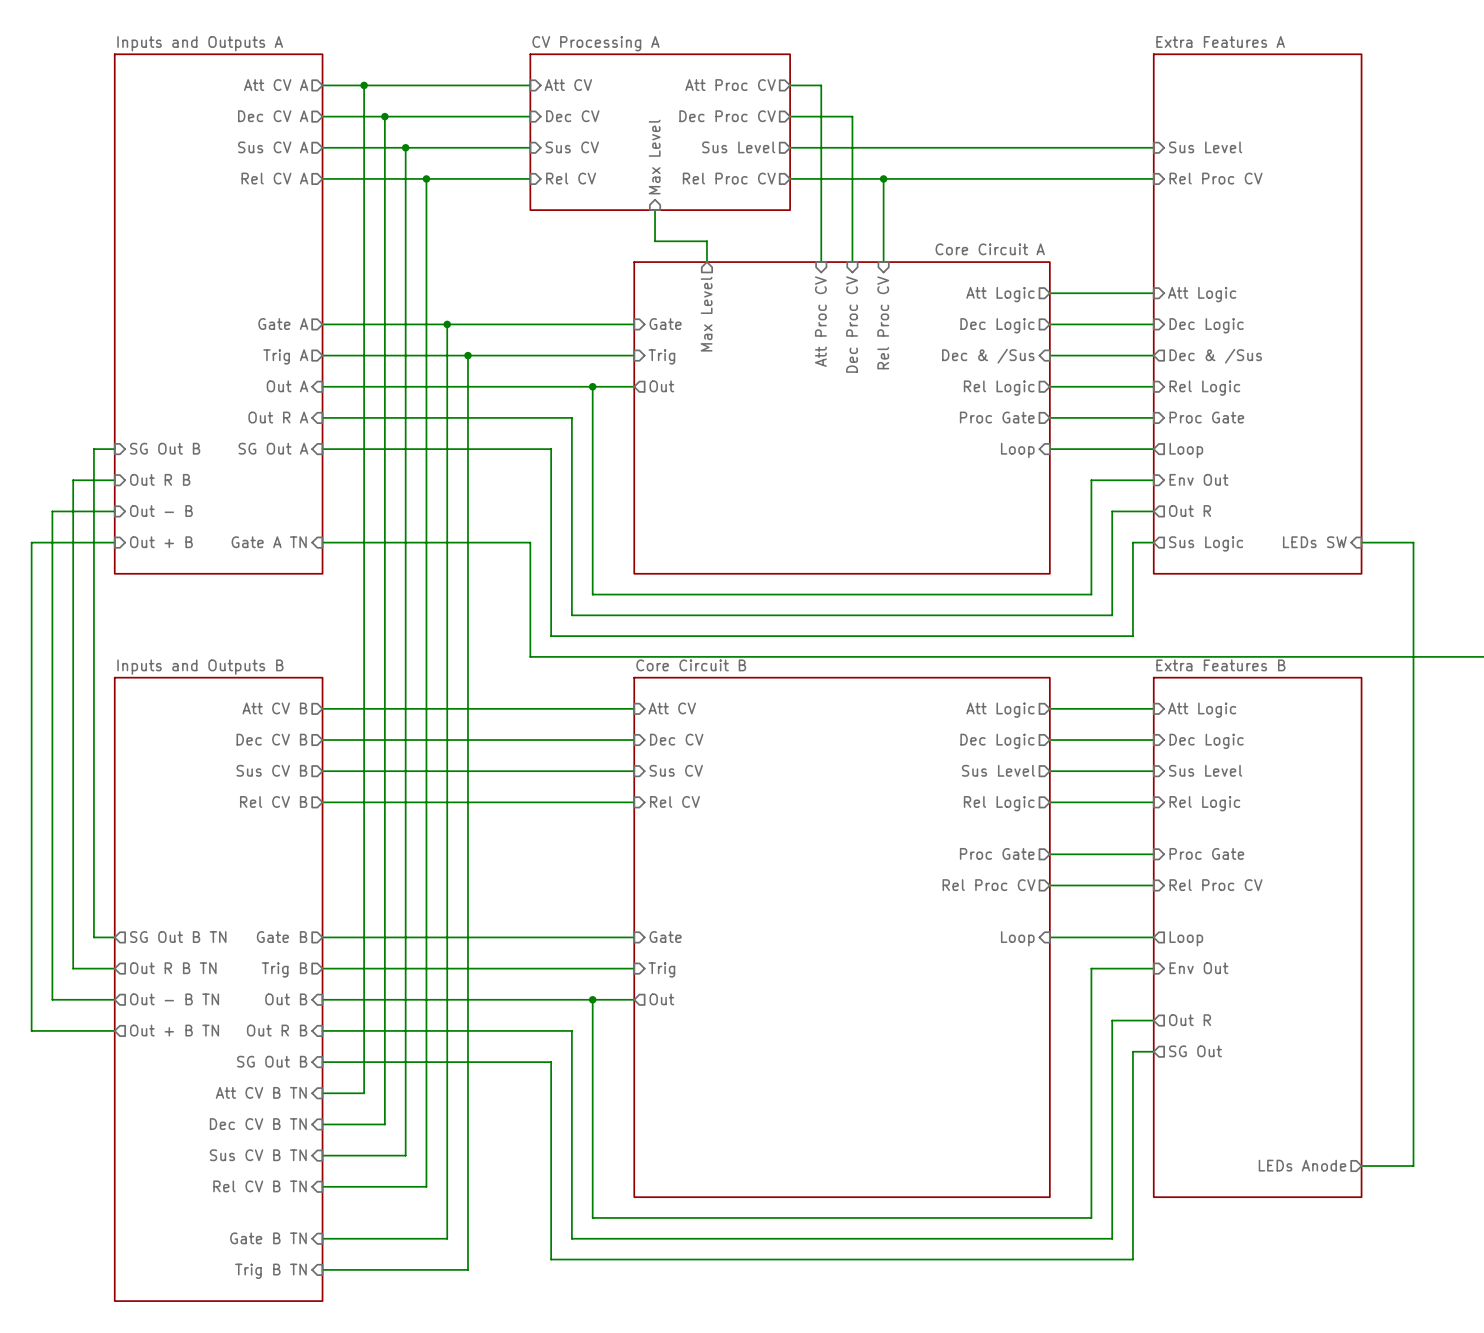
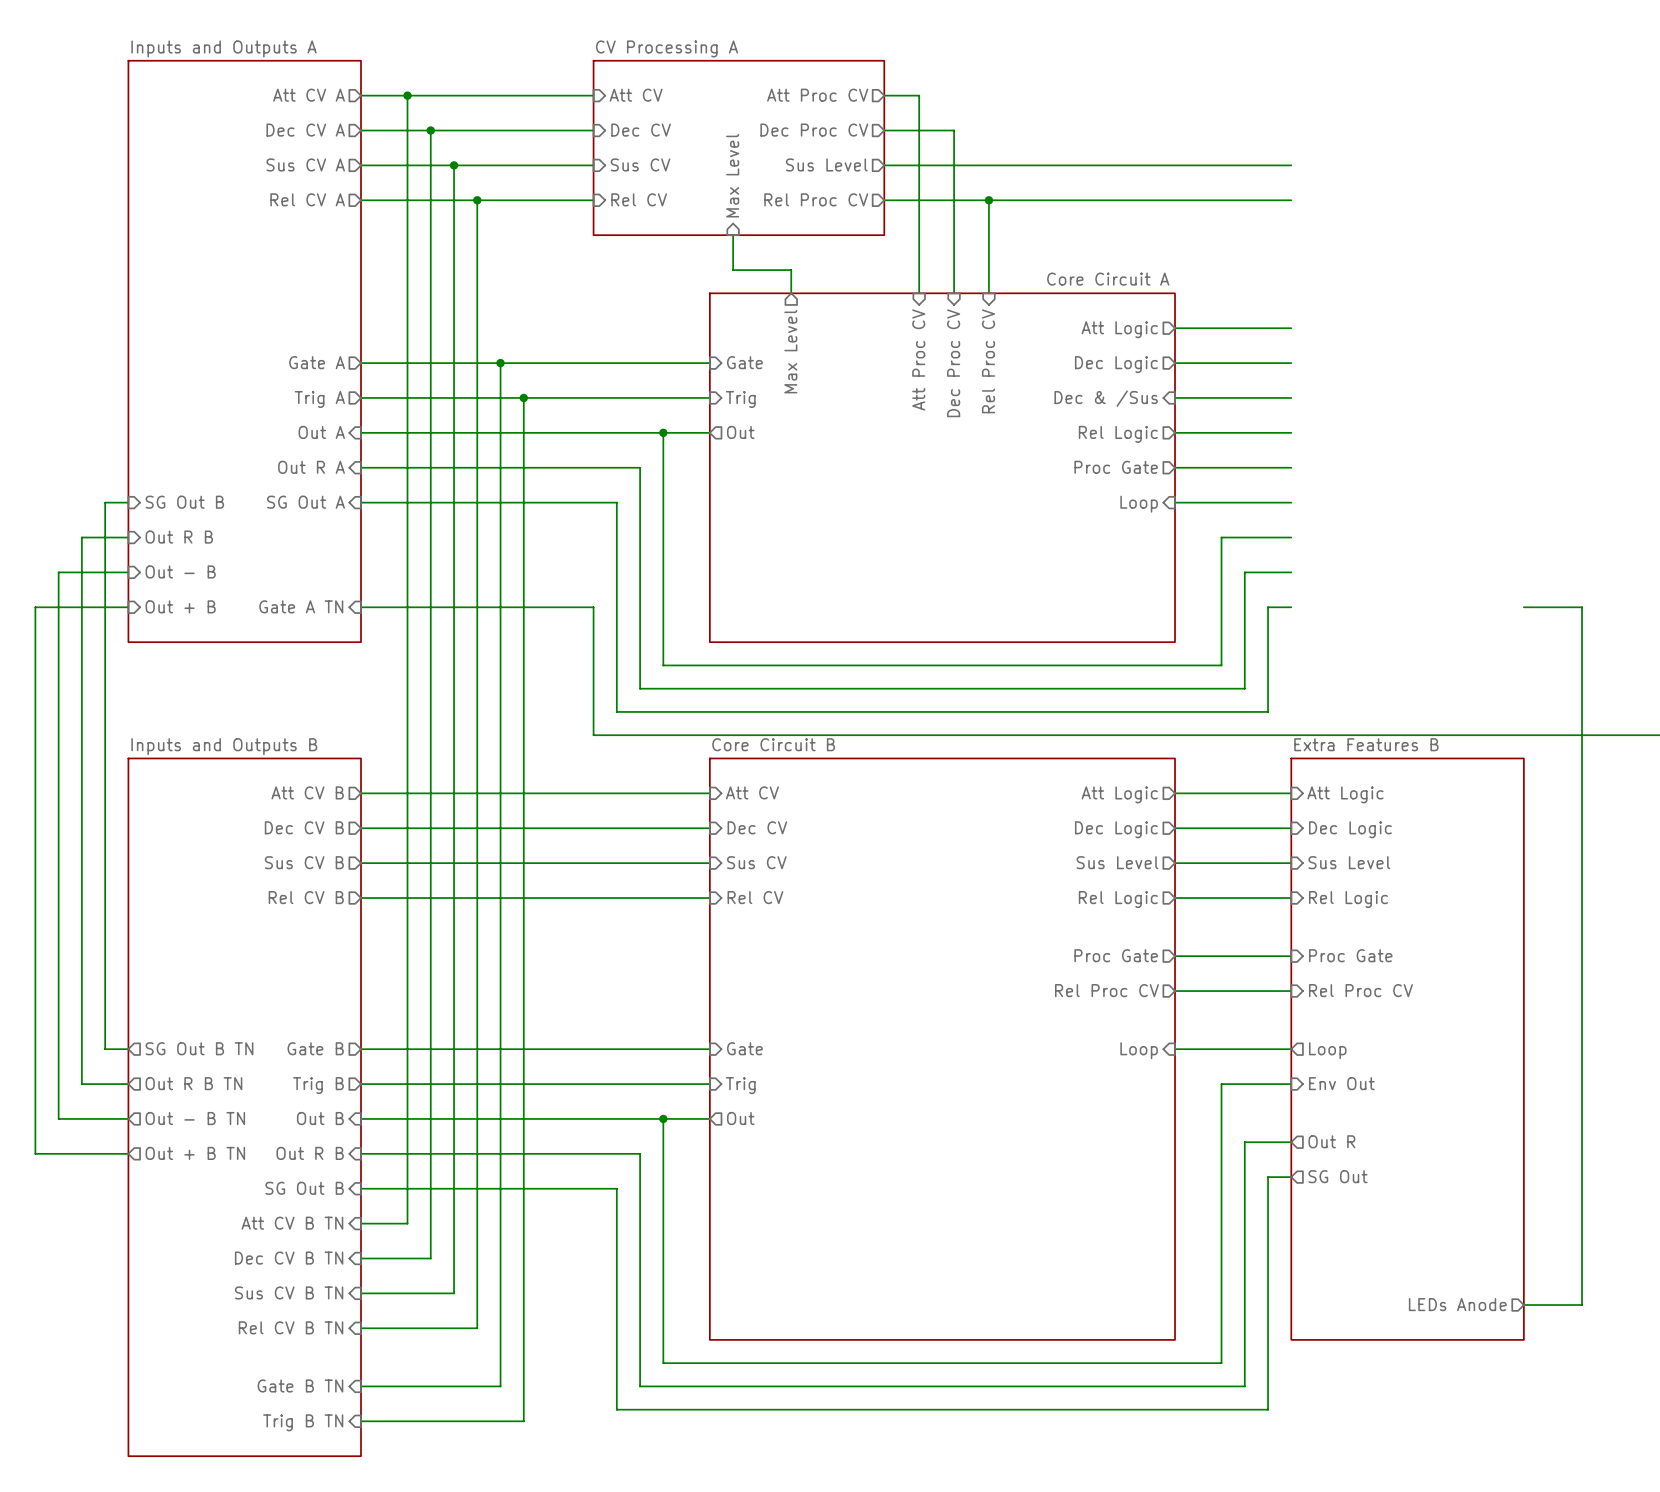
sheet pin: Sus Level (1205, 147) -> none
sheet pin: Rel Proc CV (1216, 178) -> none
sheet pin: Att Logic (1202, 294) -> none
sheet Extra Features A: (1257, 314) -> none
sheet pin: Dec Logic (1206, 325) -> none
sheet pin: Dec & /Sus (1215, 356) -> none
sheet pin: Rel Logic (1204, 388) -> none
sheet pin: Proc Gate (1206, 417) -> none
sheet pin: Loop (1186, 450) -> none
sheet pin: Env Out (1198, 479) -> none
sheet pin: Out R (1190, 511) -> none
sheet pin: LEDs SW (1314, 542) -> none
sheet pin: Sus Logic (1206, 543) -> none

